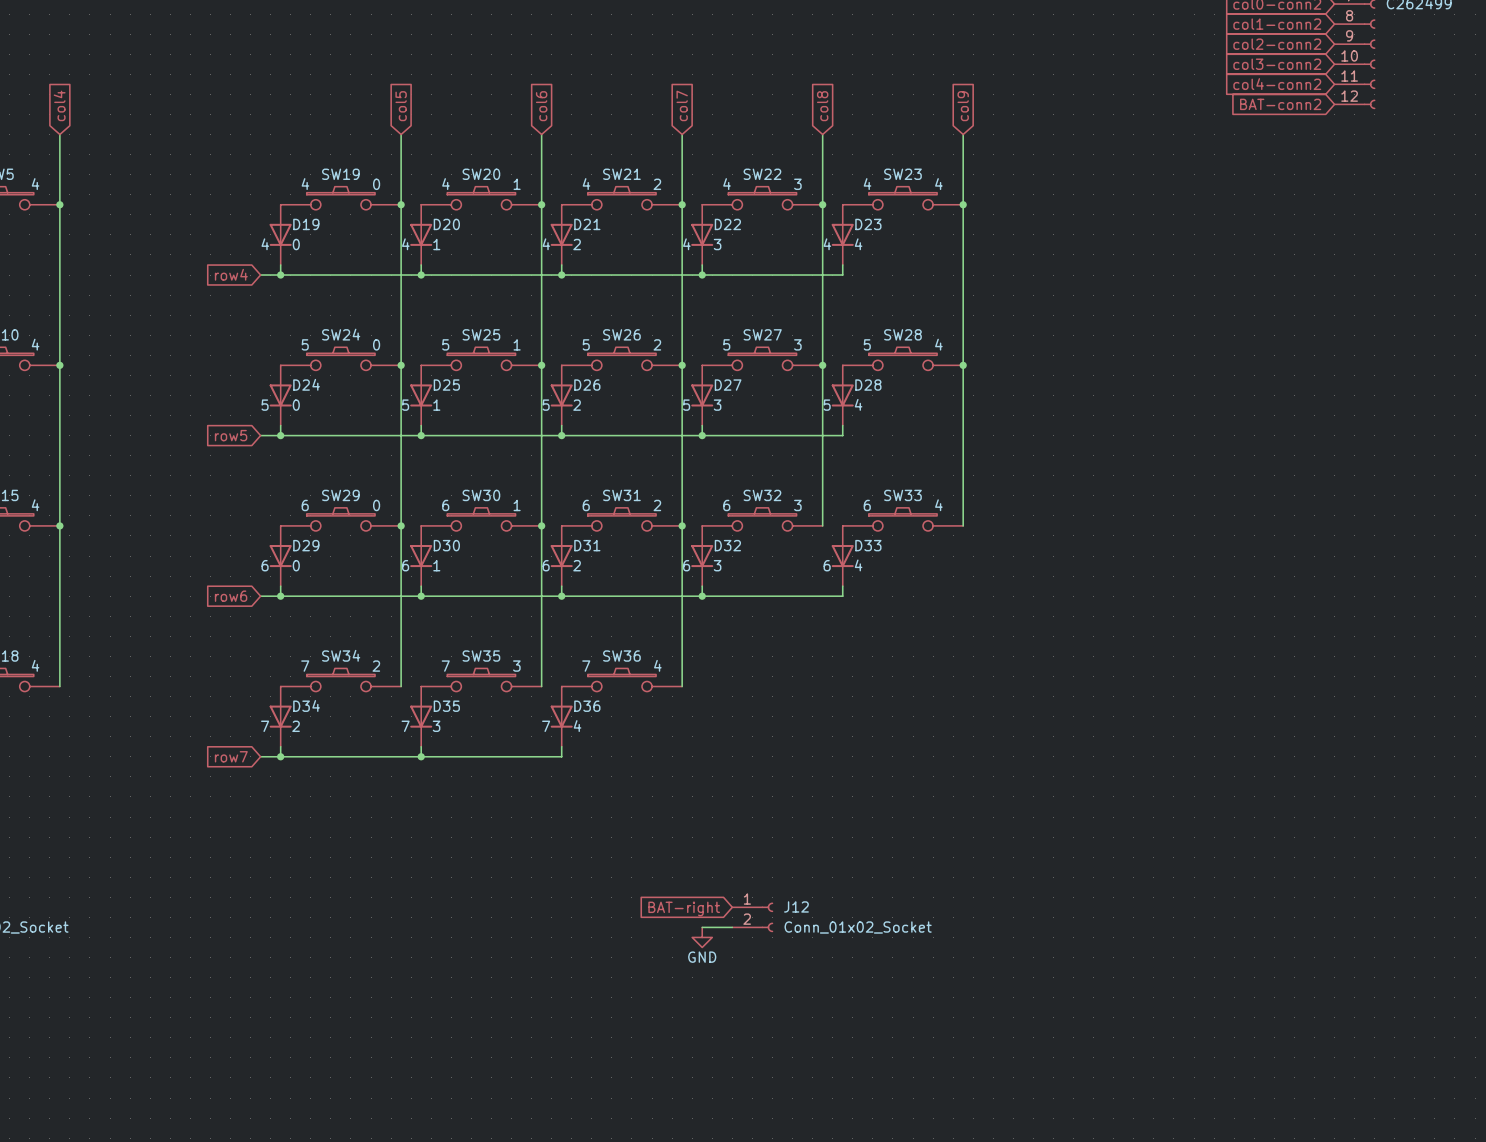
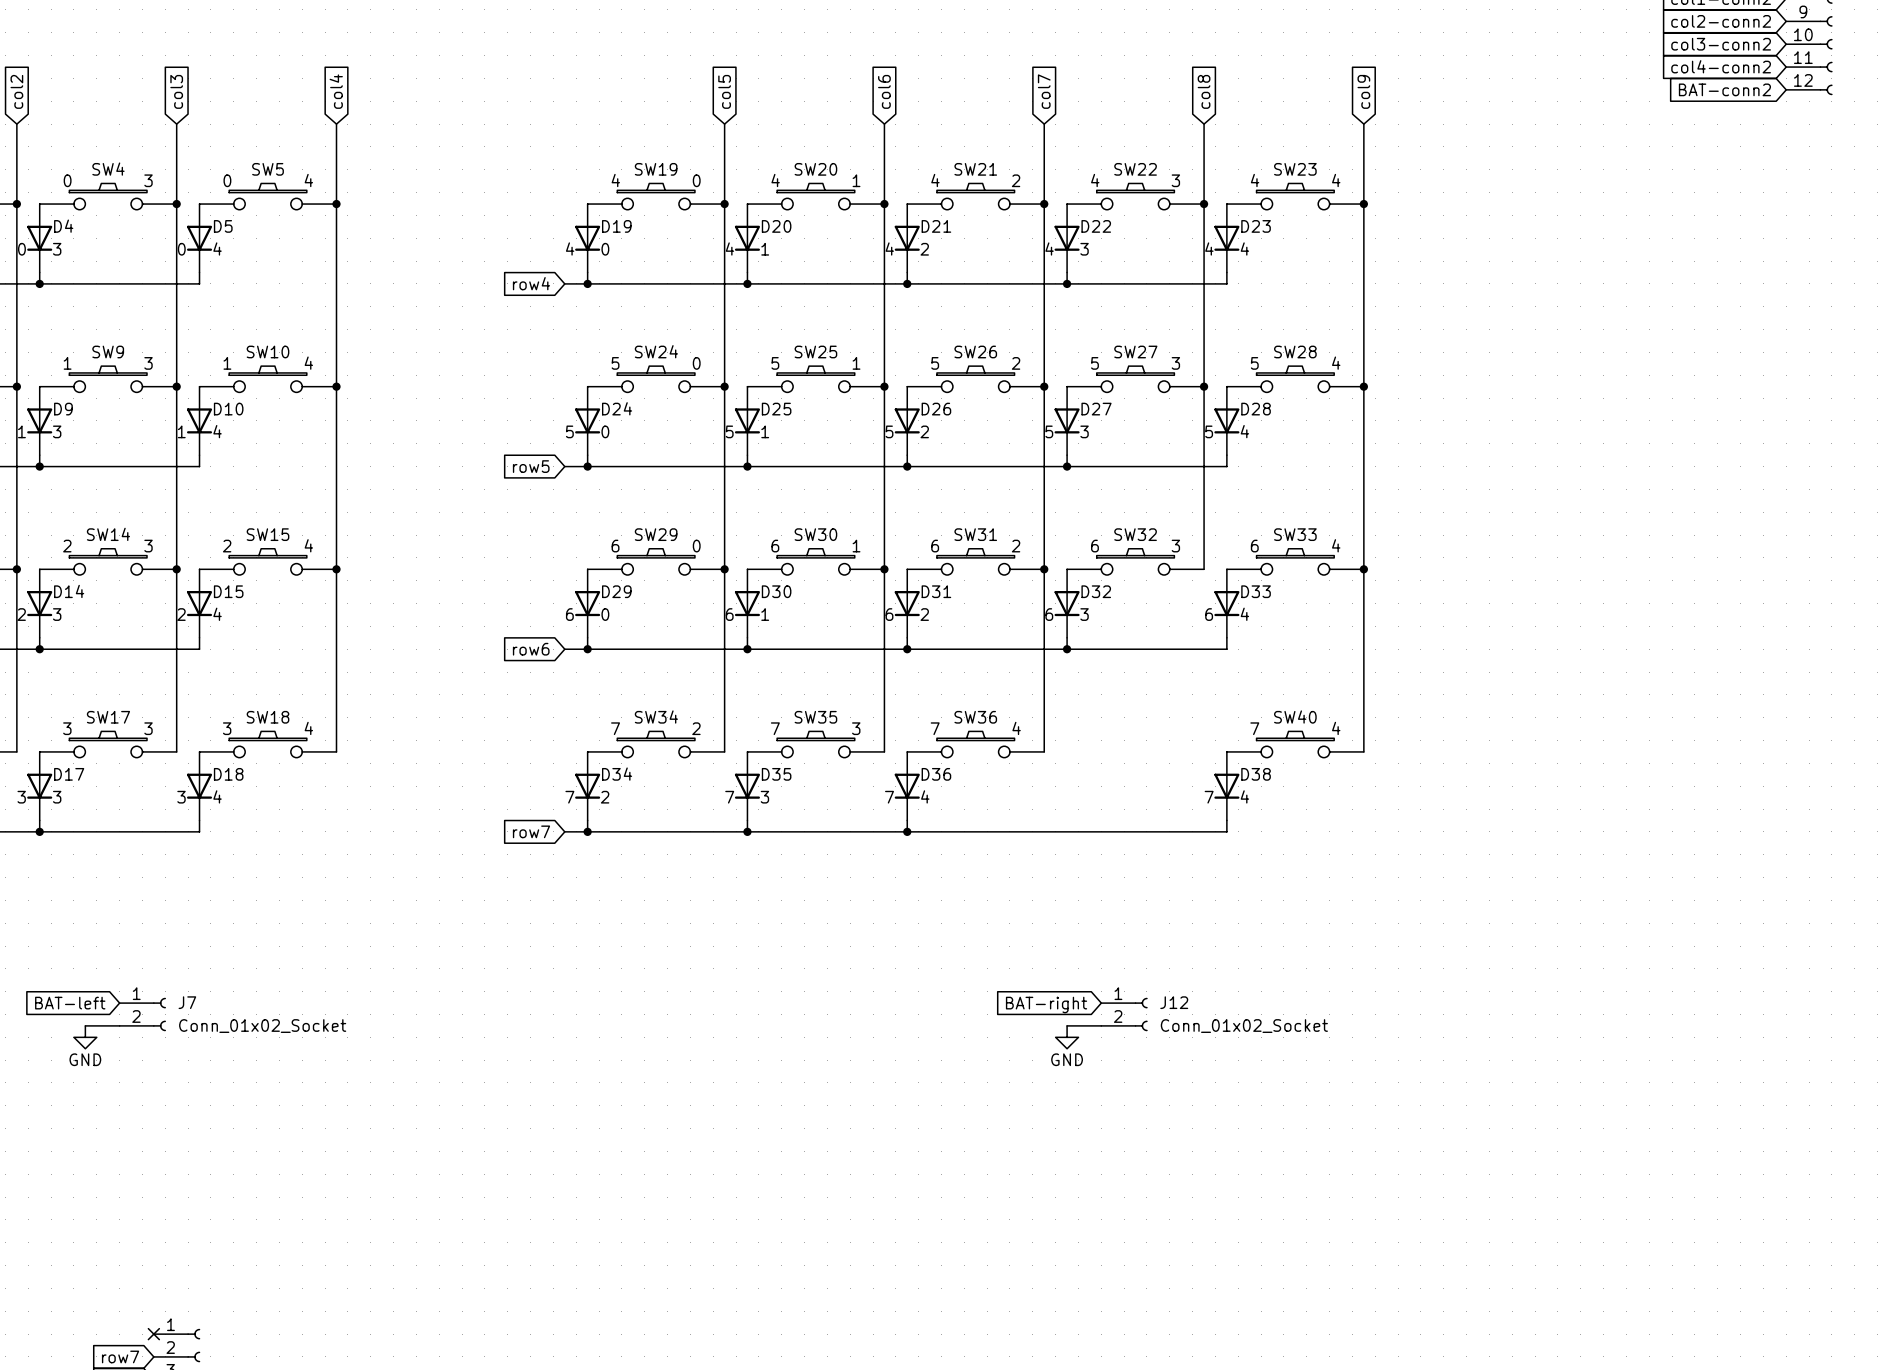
wire: none -> (1363, 569) (1363, 751)
junction: none -> (1363, 569)
SW40: none -> (1295, 744)
D38: none -> (1226, 786)
wire: none -> (1226, 820) (1226, 831) (907, 831)
junction: none -> (907, 831)

